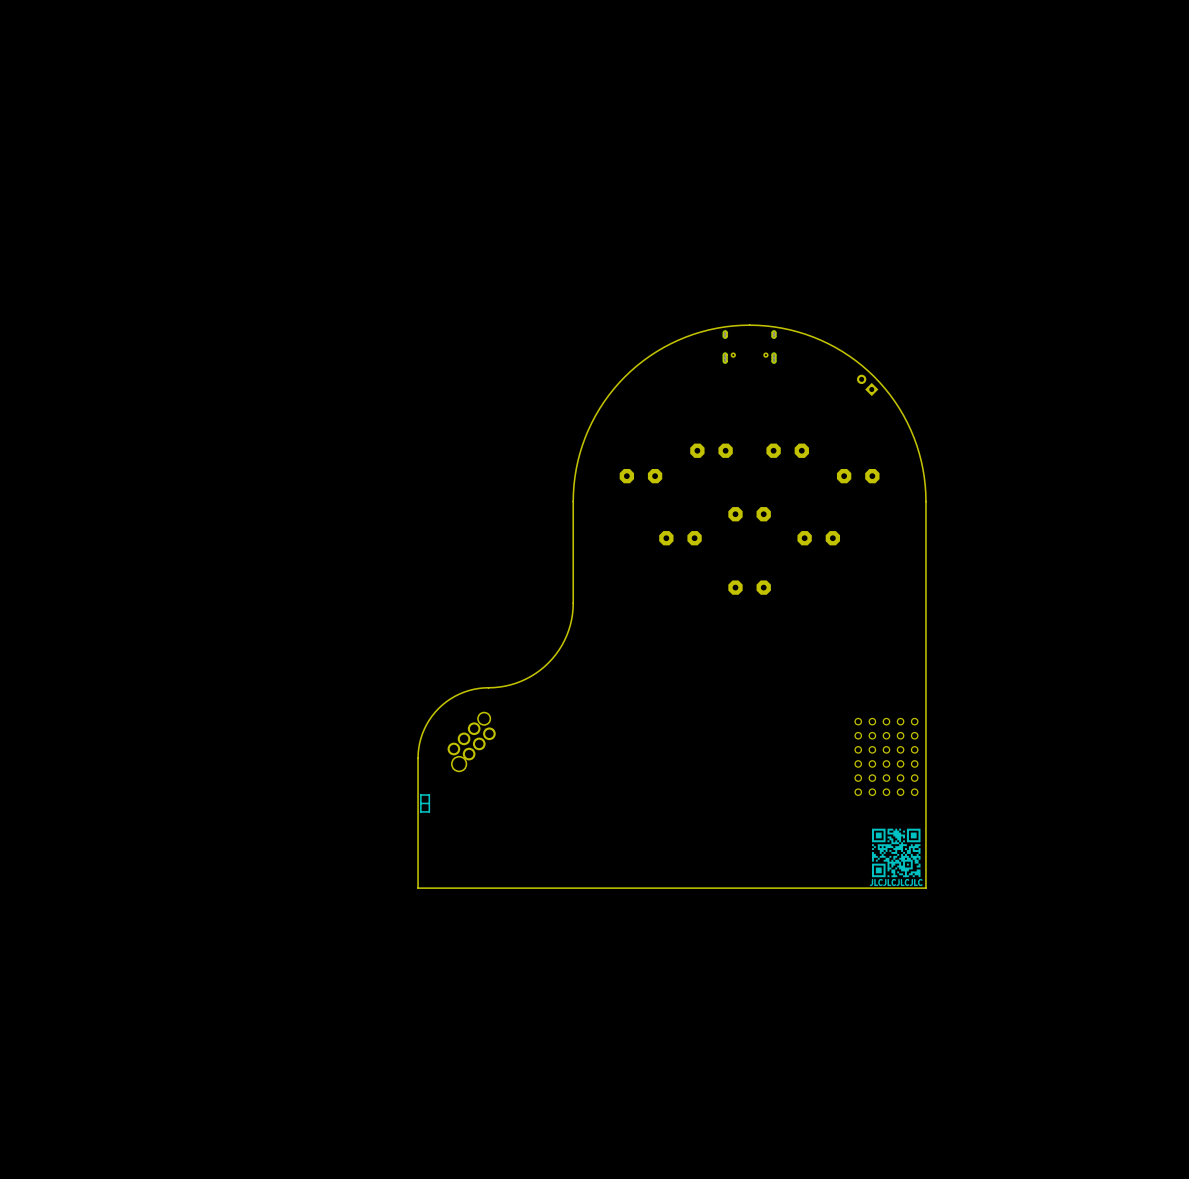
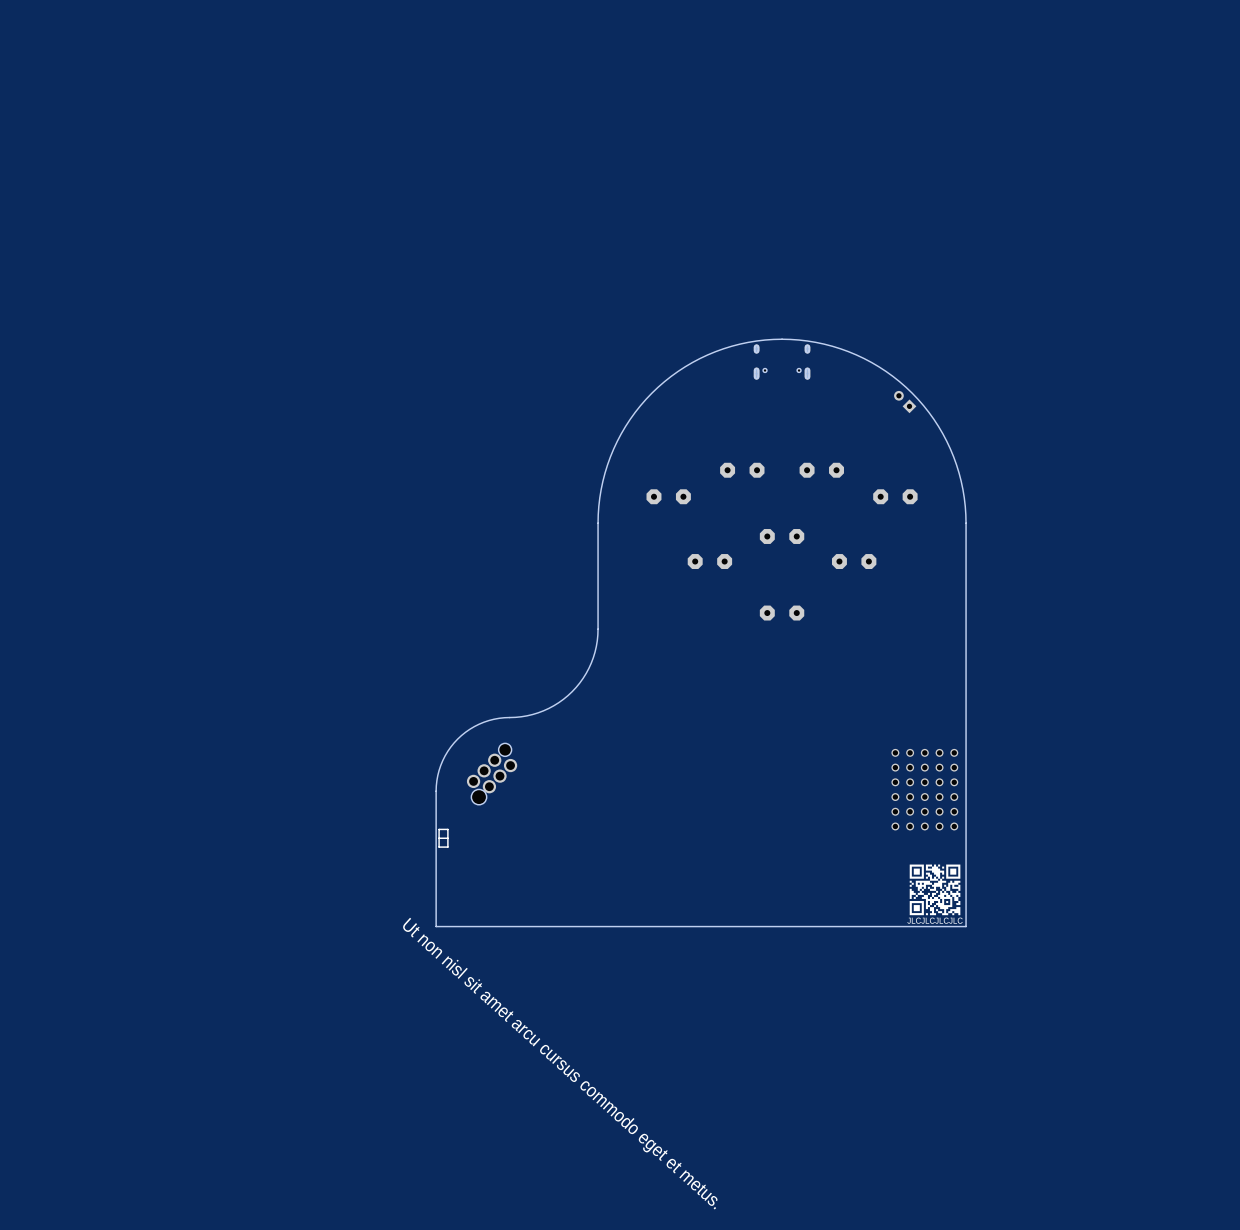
text: none -> Ut non nisl sit amet arcu cursus commodo eget et metus. (560, 1063)

